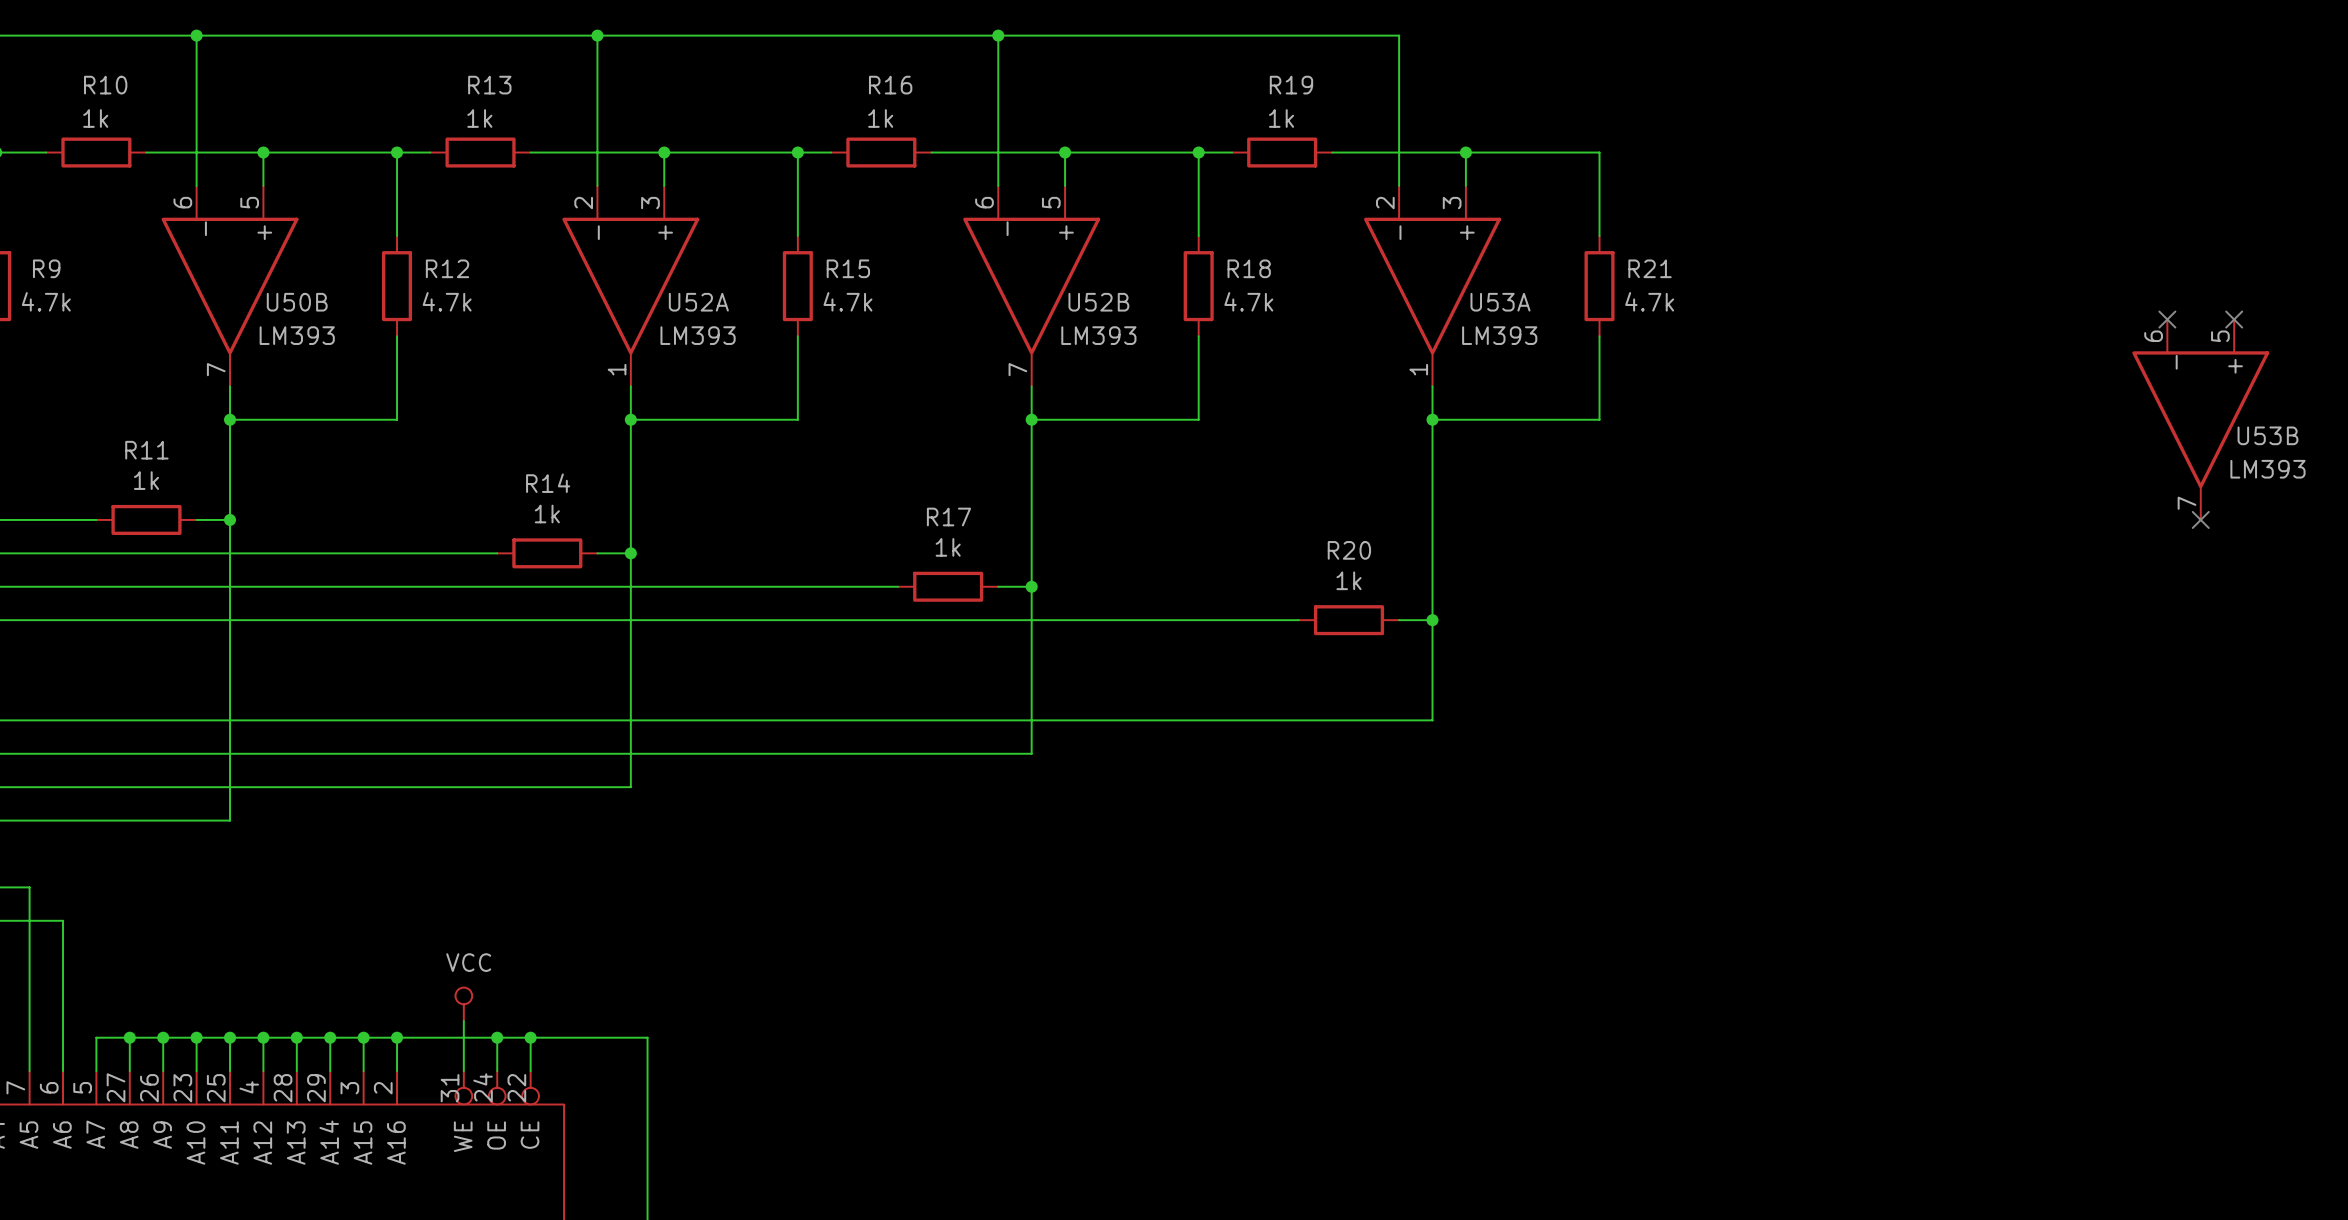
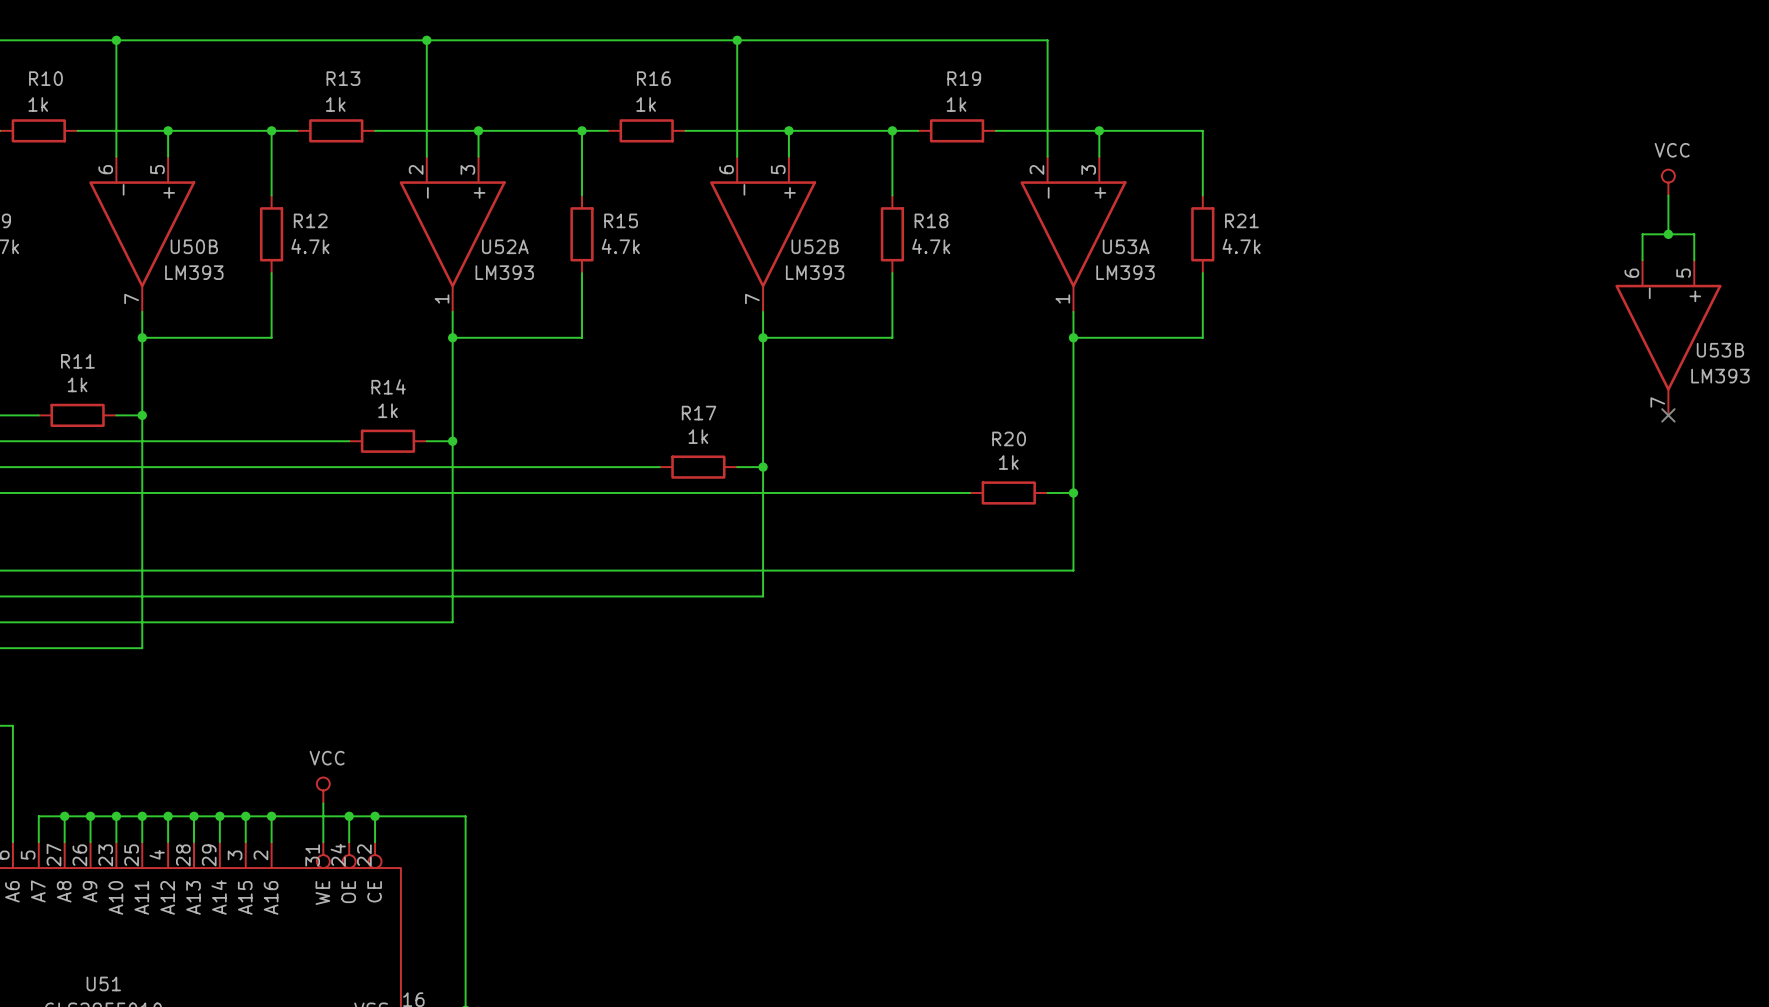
power symbol: none -> VCC (1668, 182)
wire: none -> (1668, 195) (1668, 234)
junction: none -> (1668, 234)
wire: none -> (1642, 260) (1642, 234) (1694, 234) (1694, 260)
no-connect mark: (2167, 319) -> none
no-connect mark: (2234, 319) -> none

